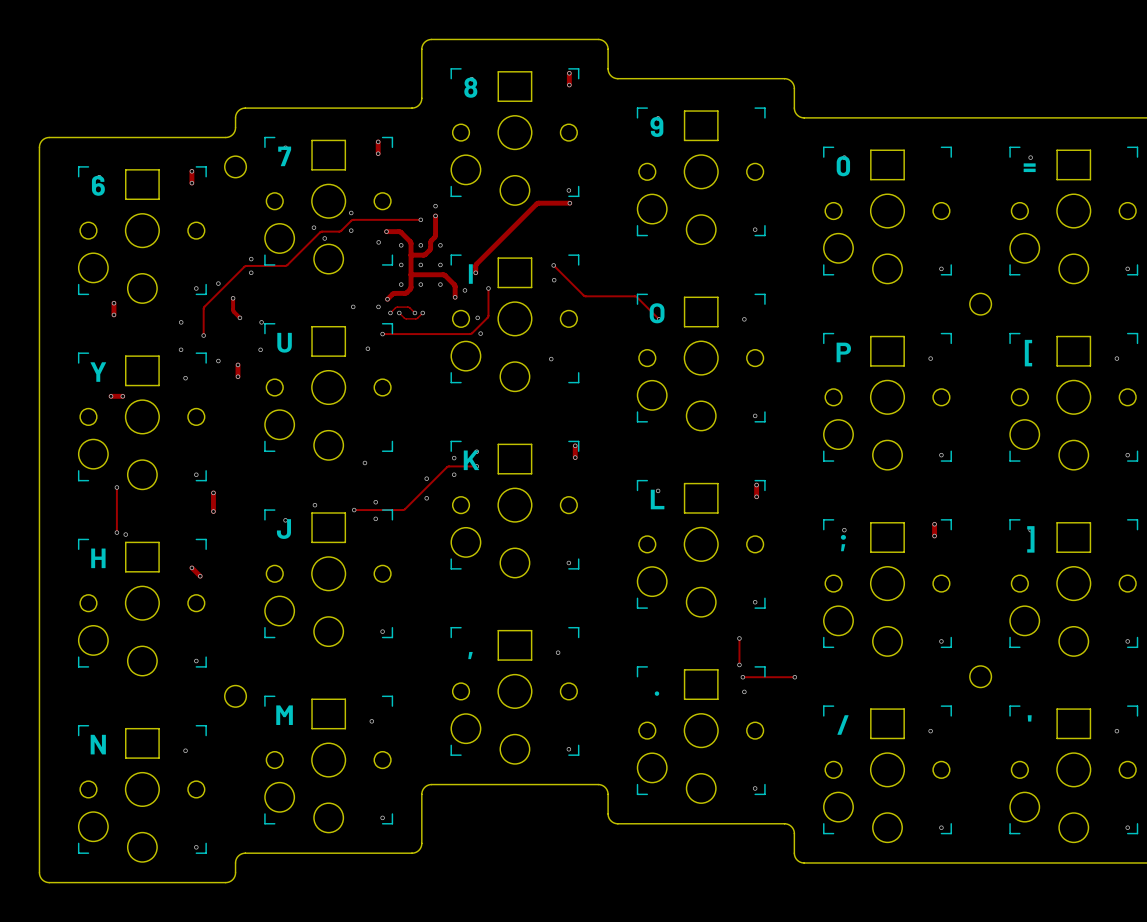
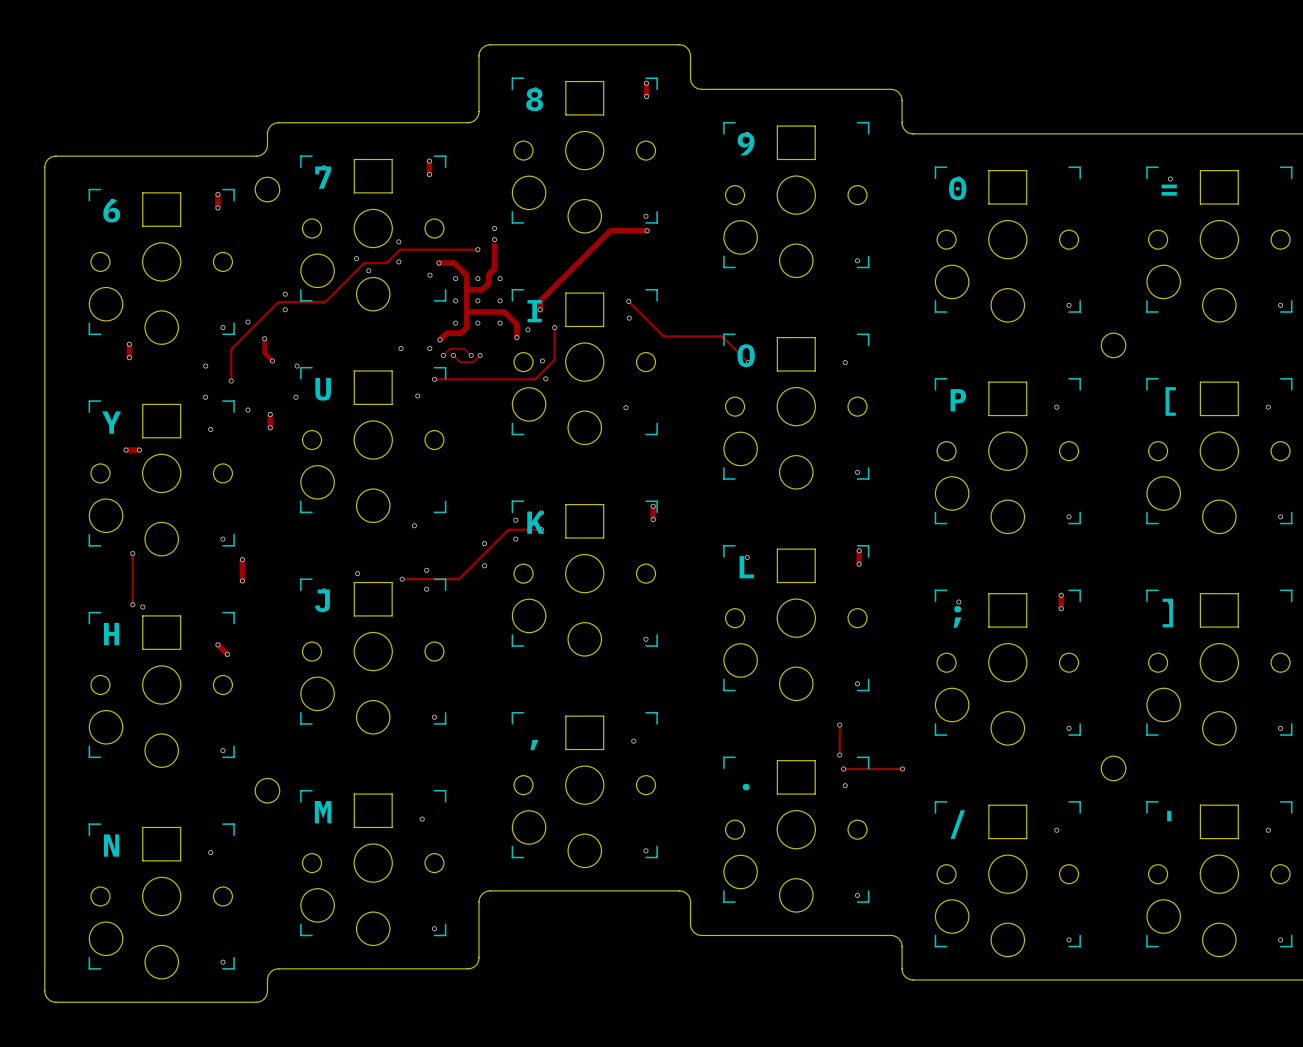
via: none -> (494, 228)
via: (435, 206) -> none
via: none -> (494, 239)
via: (435, 215) -> none

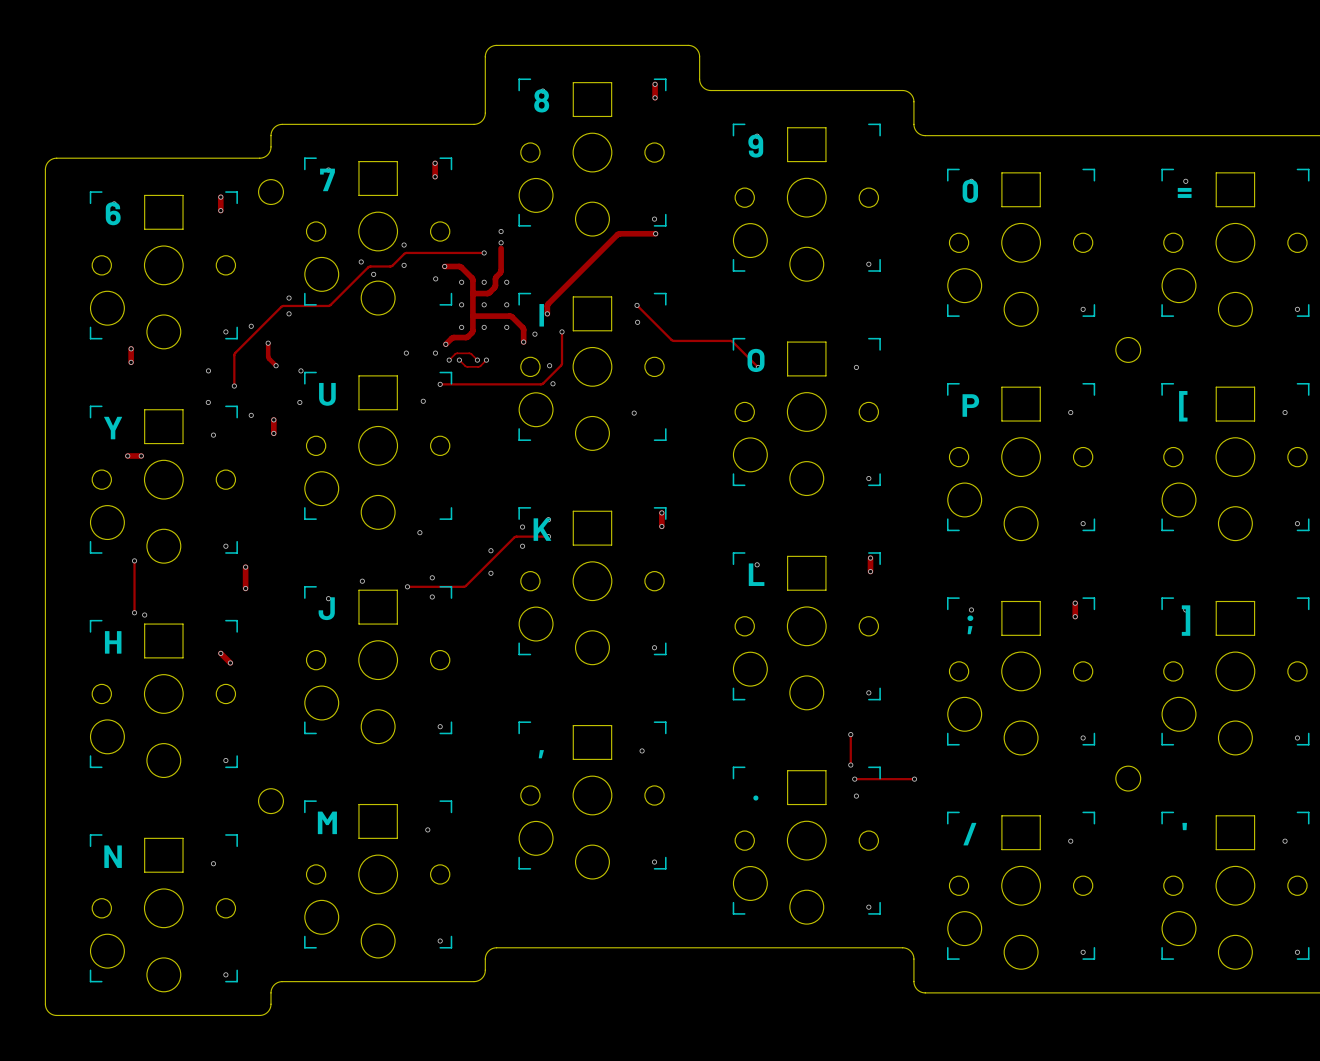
board edge: (701, 935) (696, 933) (691, 928) (690, 899) (682, 891) (490, 890) (483, 893) (479, 899) (479, 946) -> (710, 947) (496, 947) (488, 951) (485, 959)

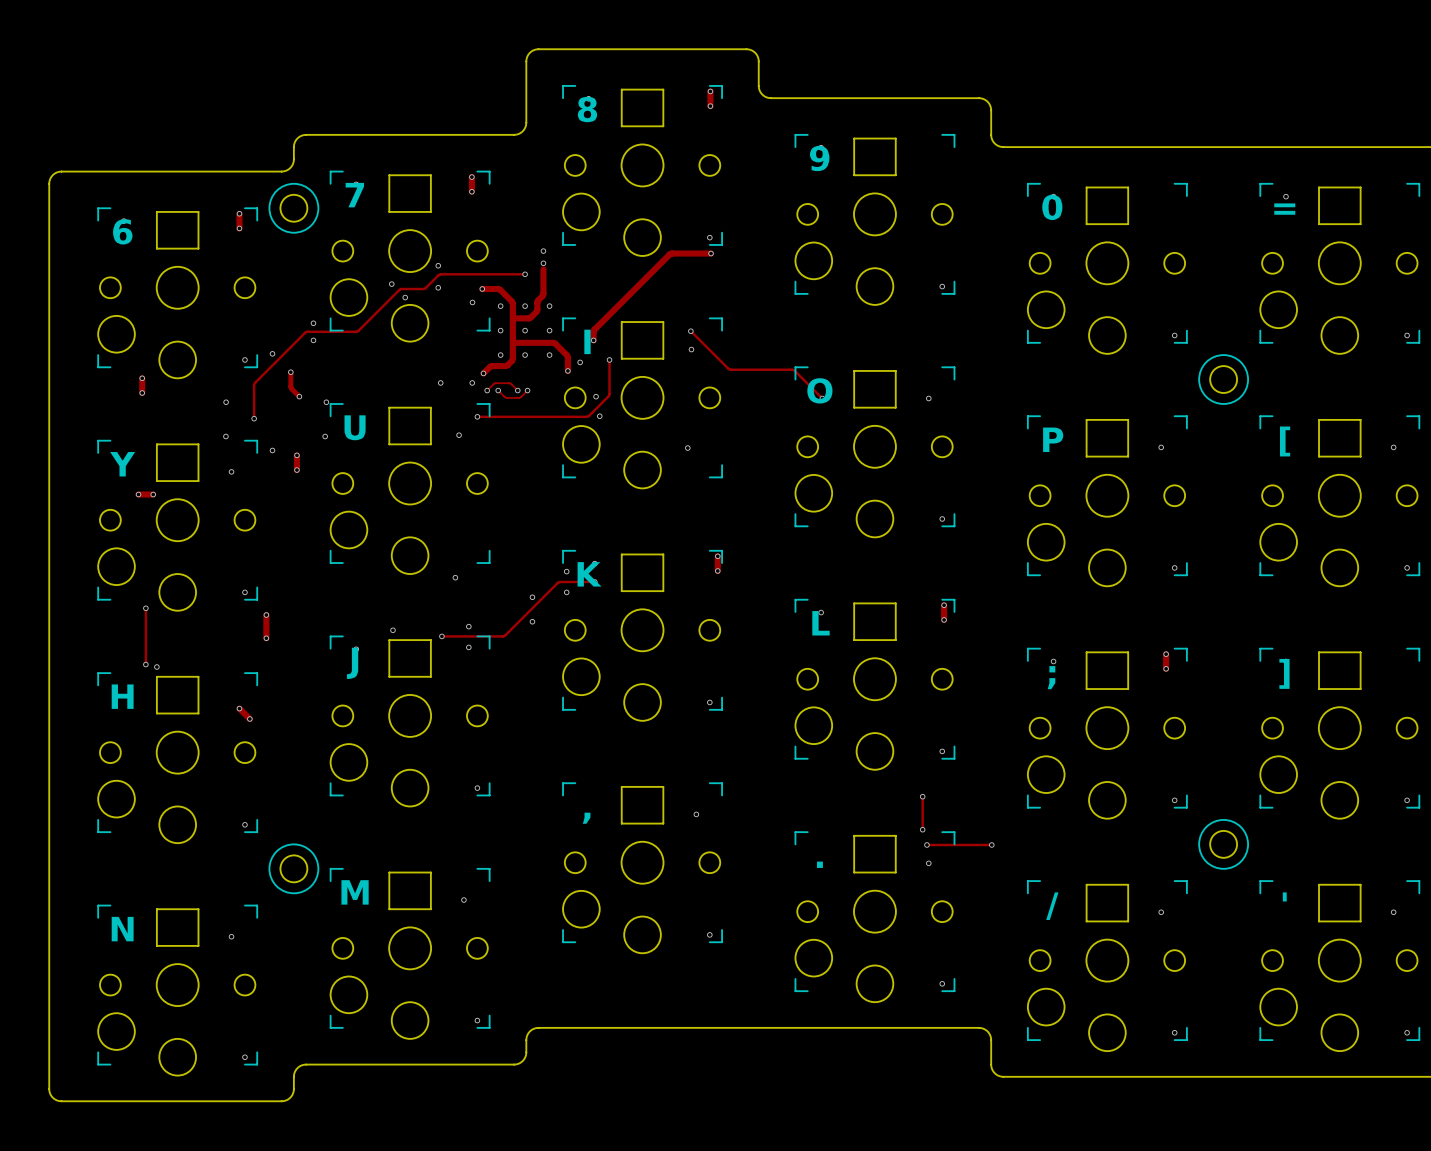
drawing: none -> [268, 183, 319, 234]
drawing: none -> [1198, 354, 1249, 405]
drawing: none -> [1198, 819, 1249, 870]
drawing: none -> [268, 843, 319, 894]

